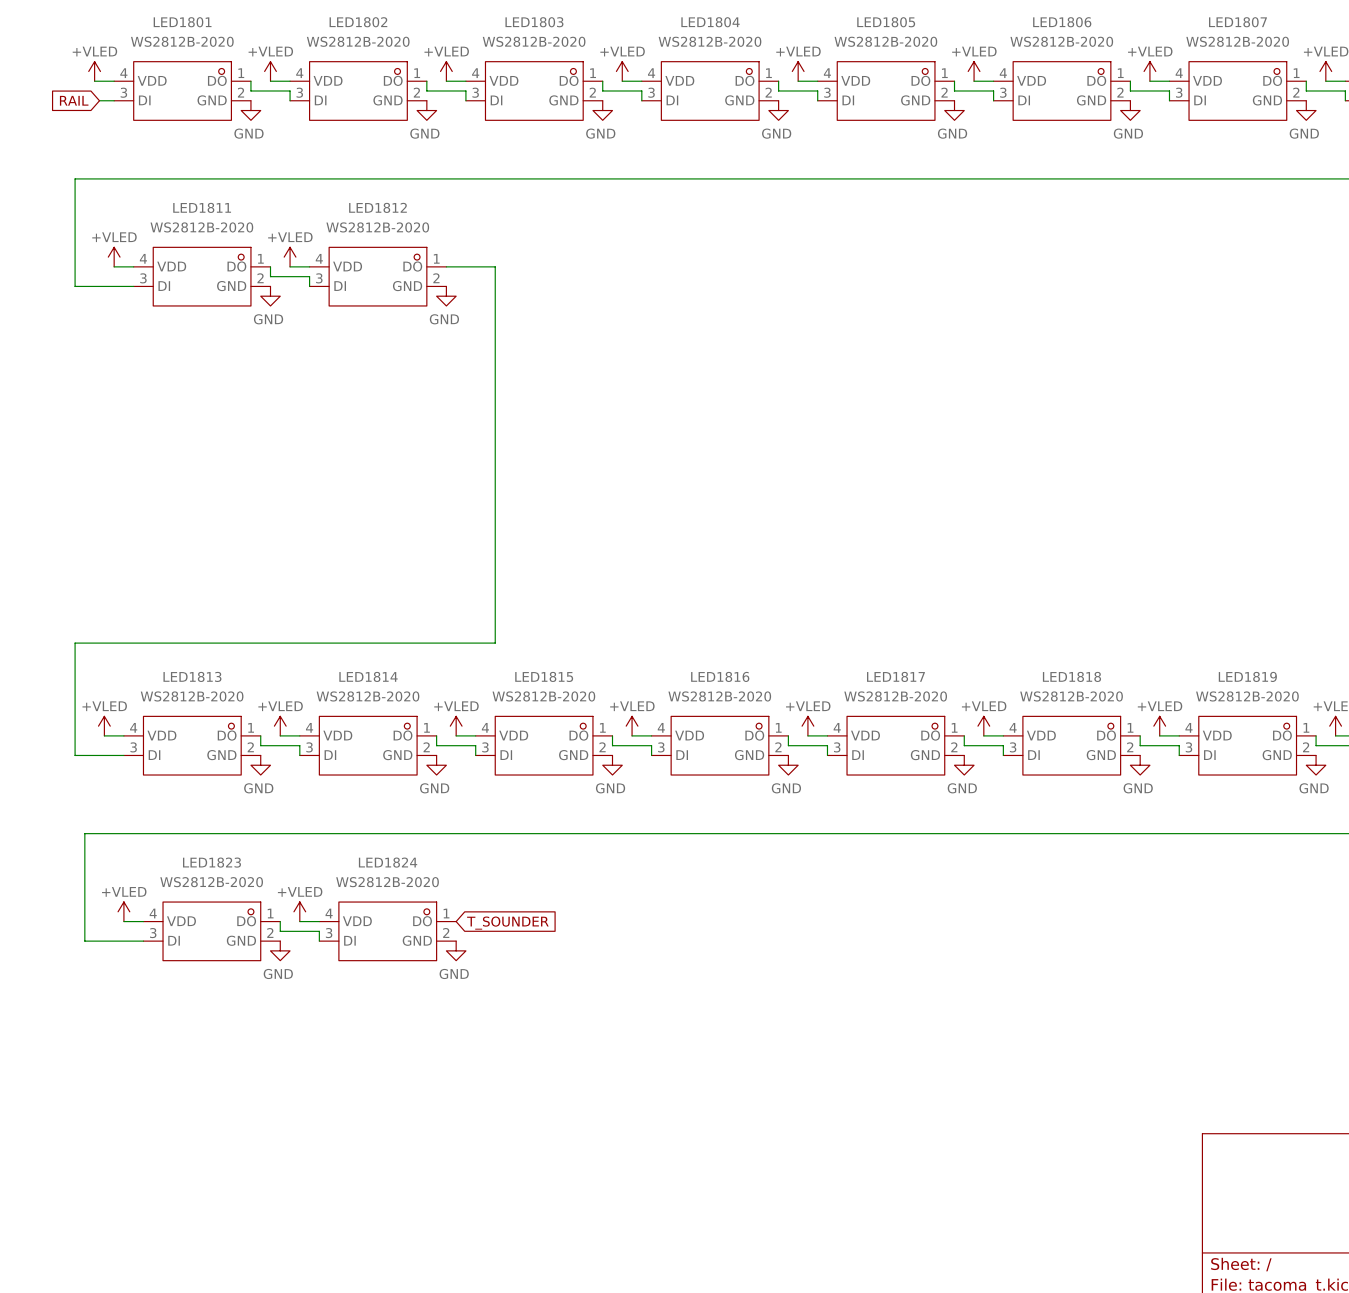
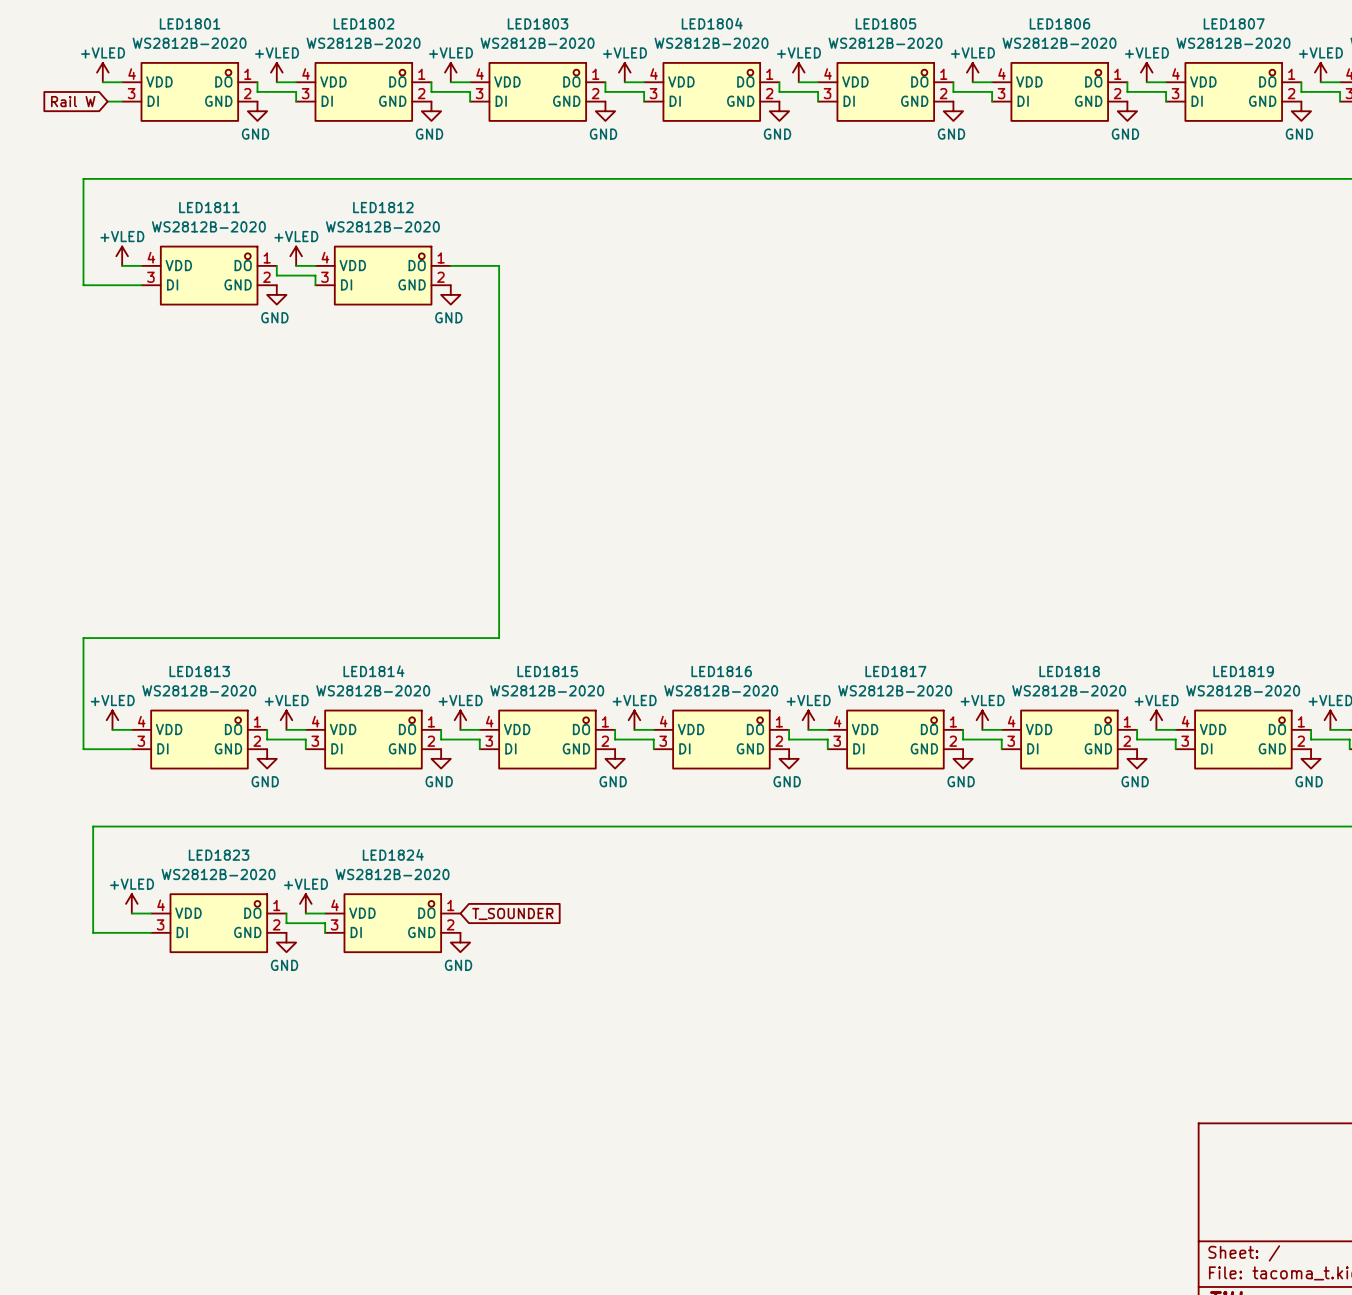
global label: RAIL (74, 100) -> Rail W (73, 101)

